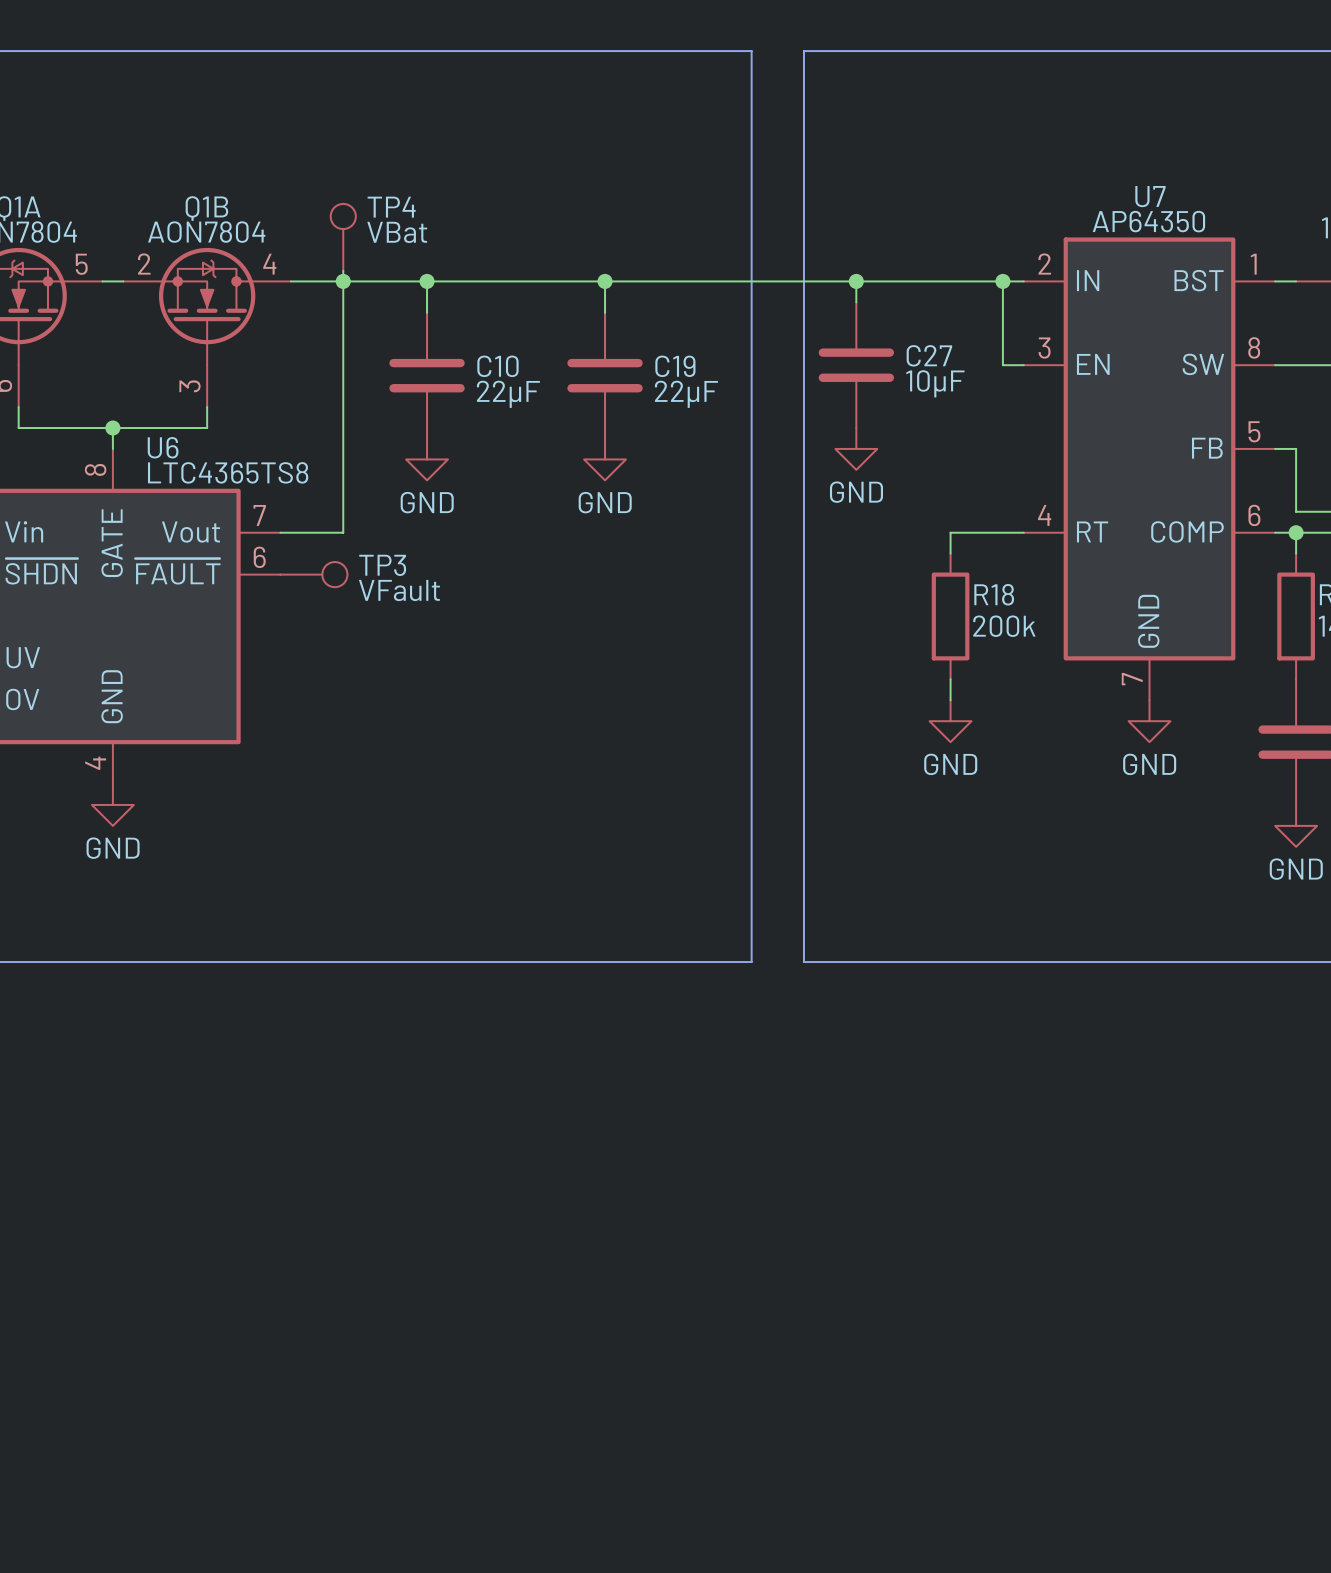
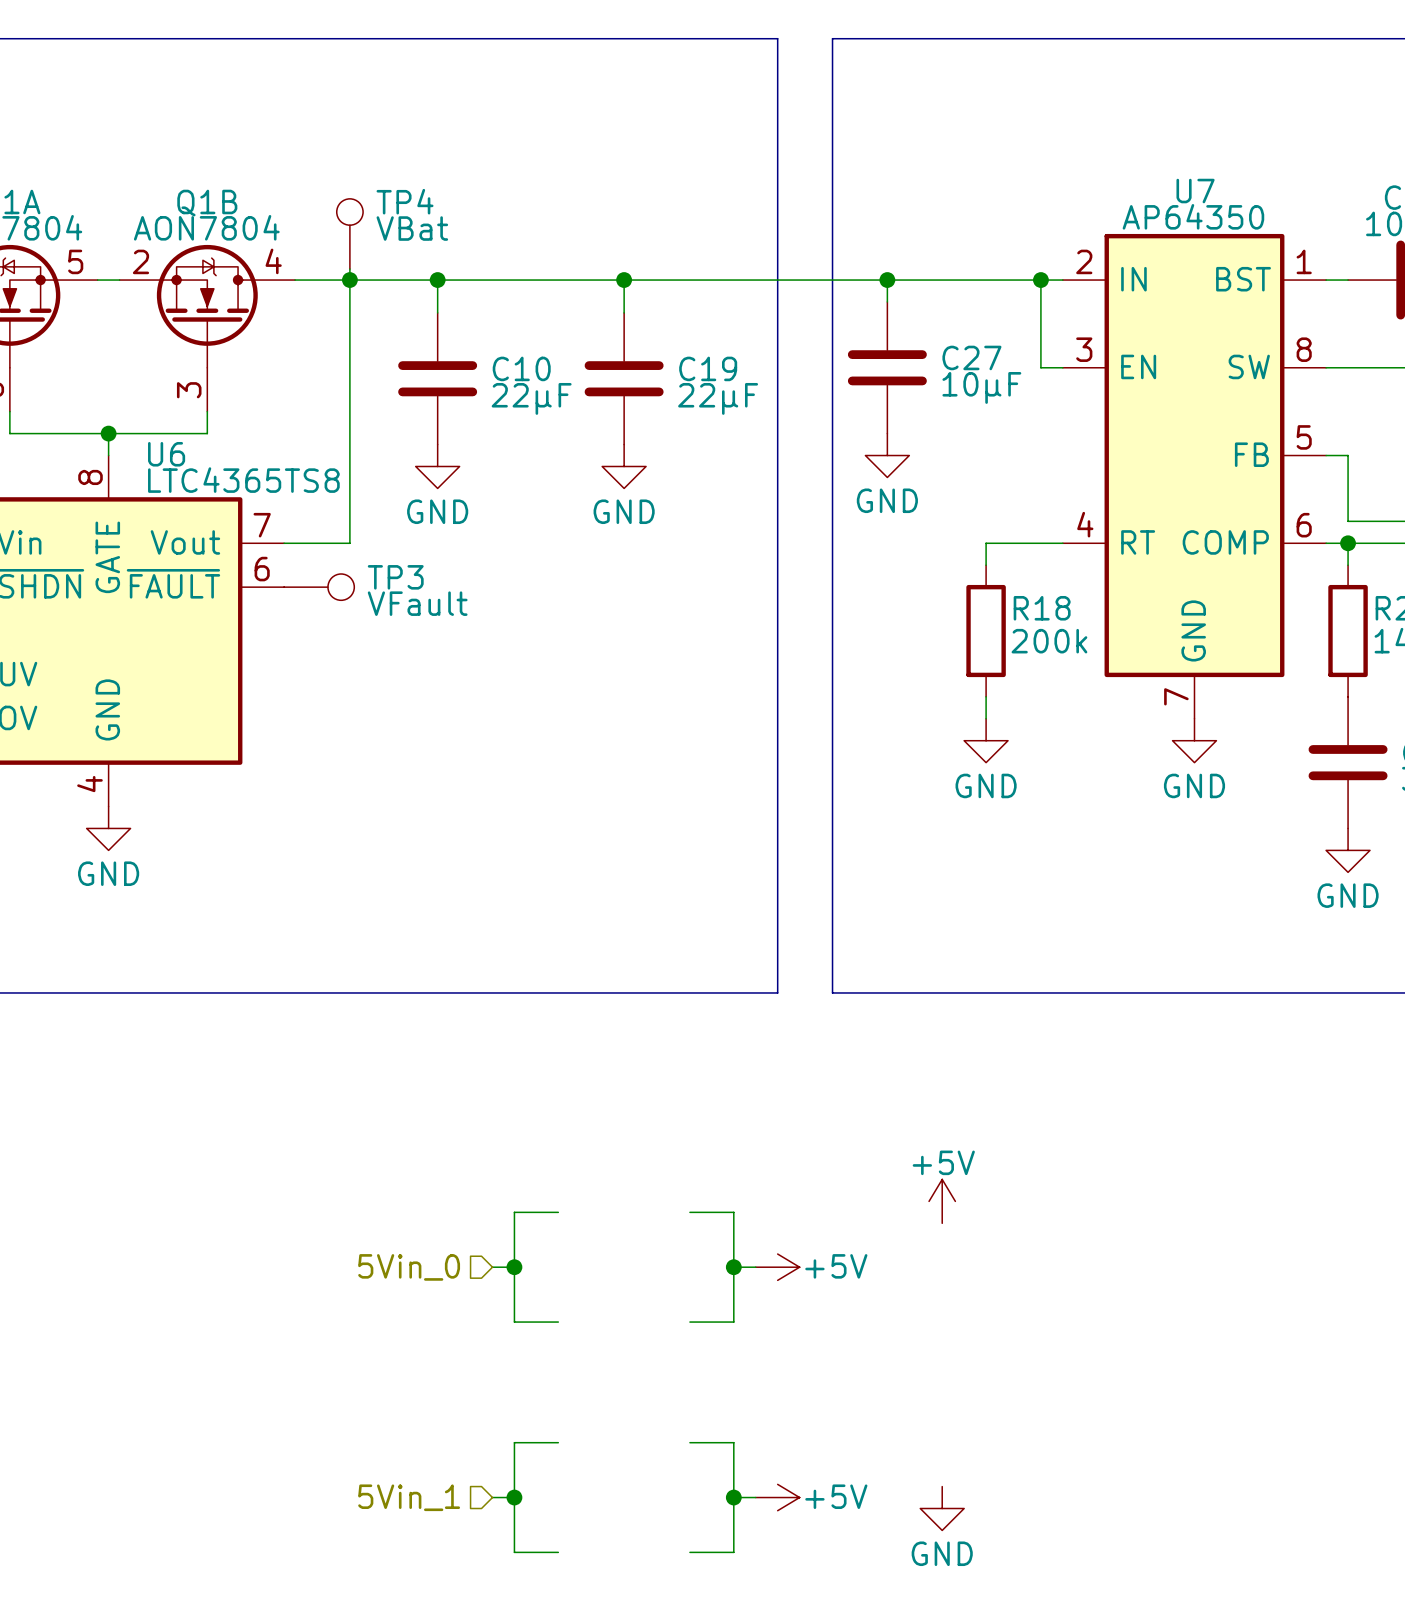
power symbol: none -> +5V (942, 1201)
wire: none -> (558, 1212) (514, 1212) (514, 1322) (558, 1322)
wire: none -> (689, 1212) (733, 1212) (733, 1322) (689, 1322)
hierarchical label: none -> 5Vin_0 (409, 1267)
wire: none -> (492, 1267) (514, 1267)
junction: none -> (514, 1267)
wire: none -> (733, 1267) (755, 1267)
junction: none -> (733, 1267)
power symbol: none -> +5V (777, 1267)
wire: none -> (558, 1442) (514, 1442) (514, 1552) (558, 1552)
wire: none -> (689, 1442) (733, 1442) (733, 1552) (689, 1552)
hierarchical label: none -> 5Vin_1 (409, 1497)
wire: none -> (492, 1497) (514, 1497)
junction: none -> (514, 1497)
wire: none -> (733, 1497) (755, 1497)
junction: none -> (733, 1497)
power symbol: none -> +5V (777, 1497)
power symbol: none -> GND (942, 1508)

